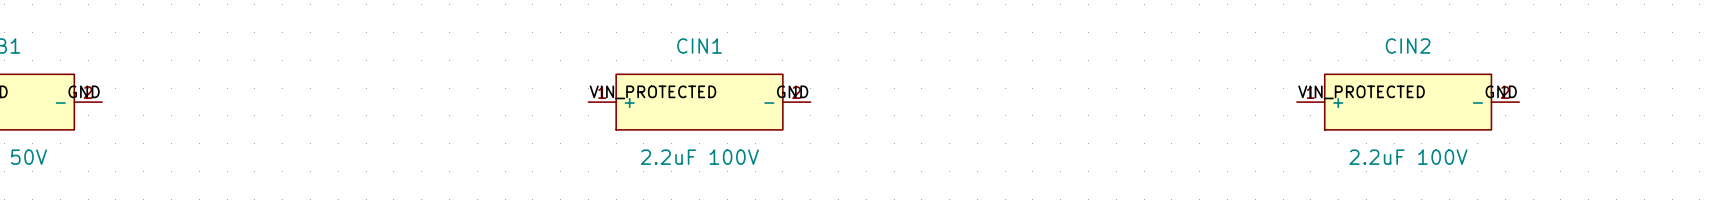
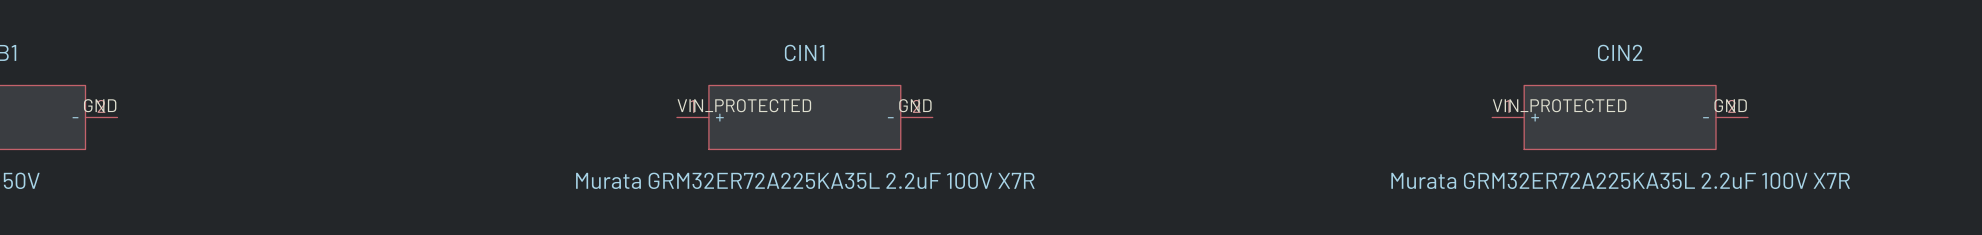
CIN1 value: 2.2uF 100V (699, 157) -> Murata GRM32ER72A225KA35L 2.2uF 100V X7R (805, 180)
CIN2 value: 2.2uF 100V (1408, 157) -> Murata GRM32ER72A225KA35L 2.2uF 100V X7R (1620, 180)

